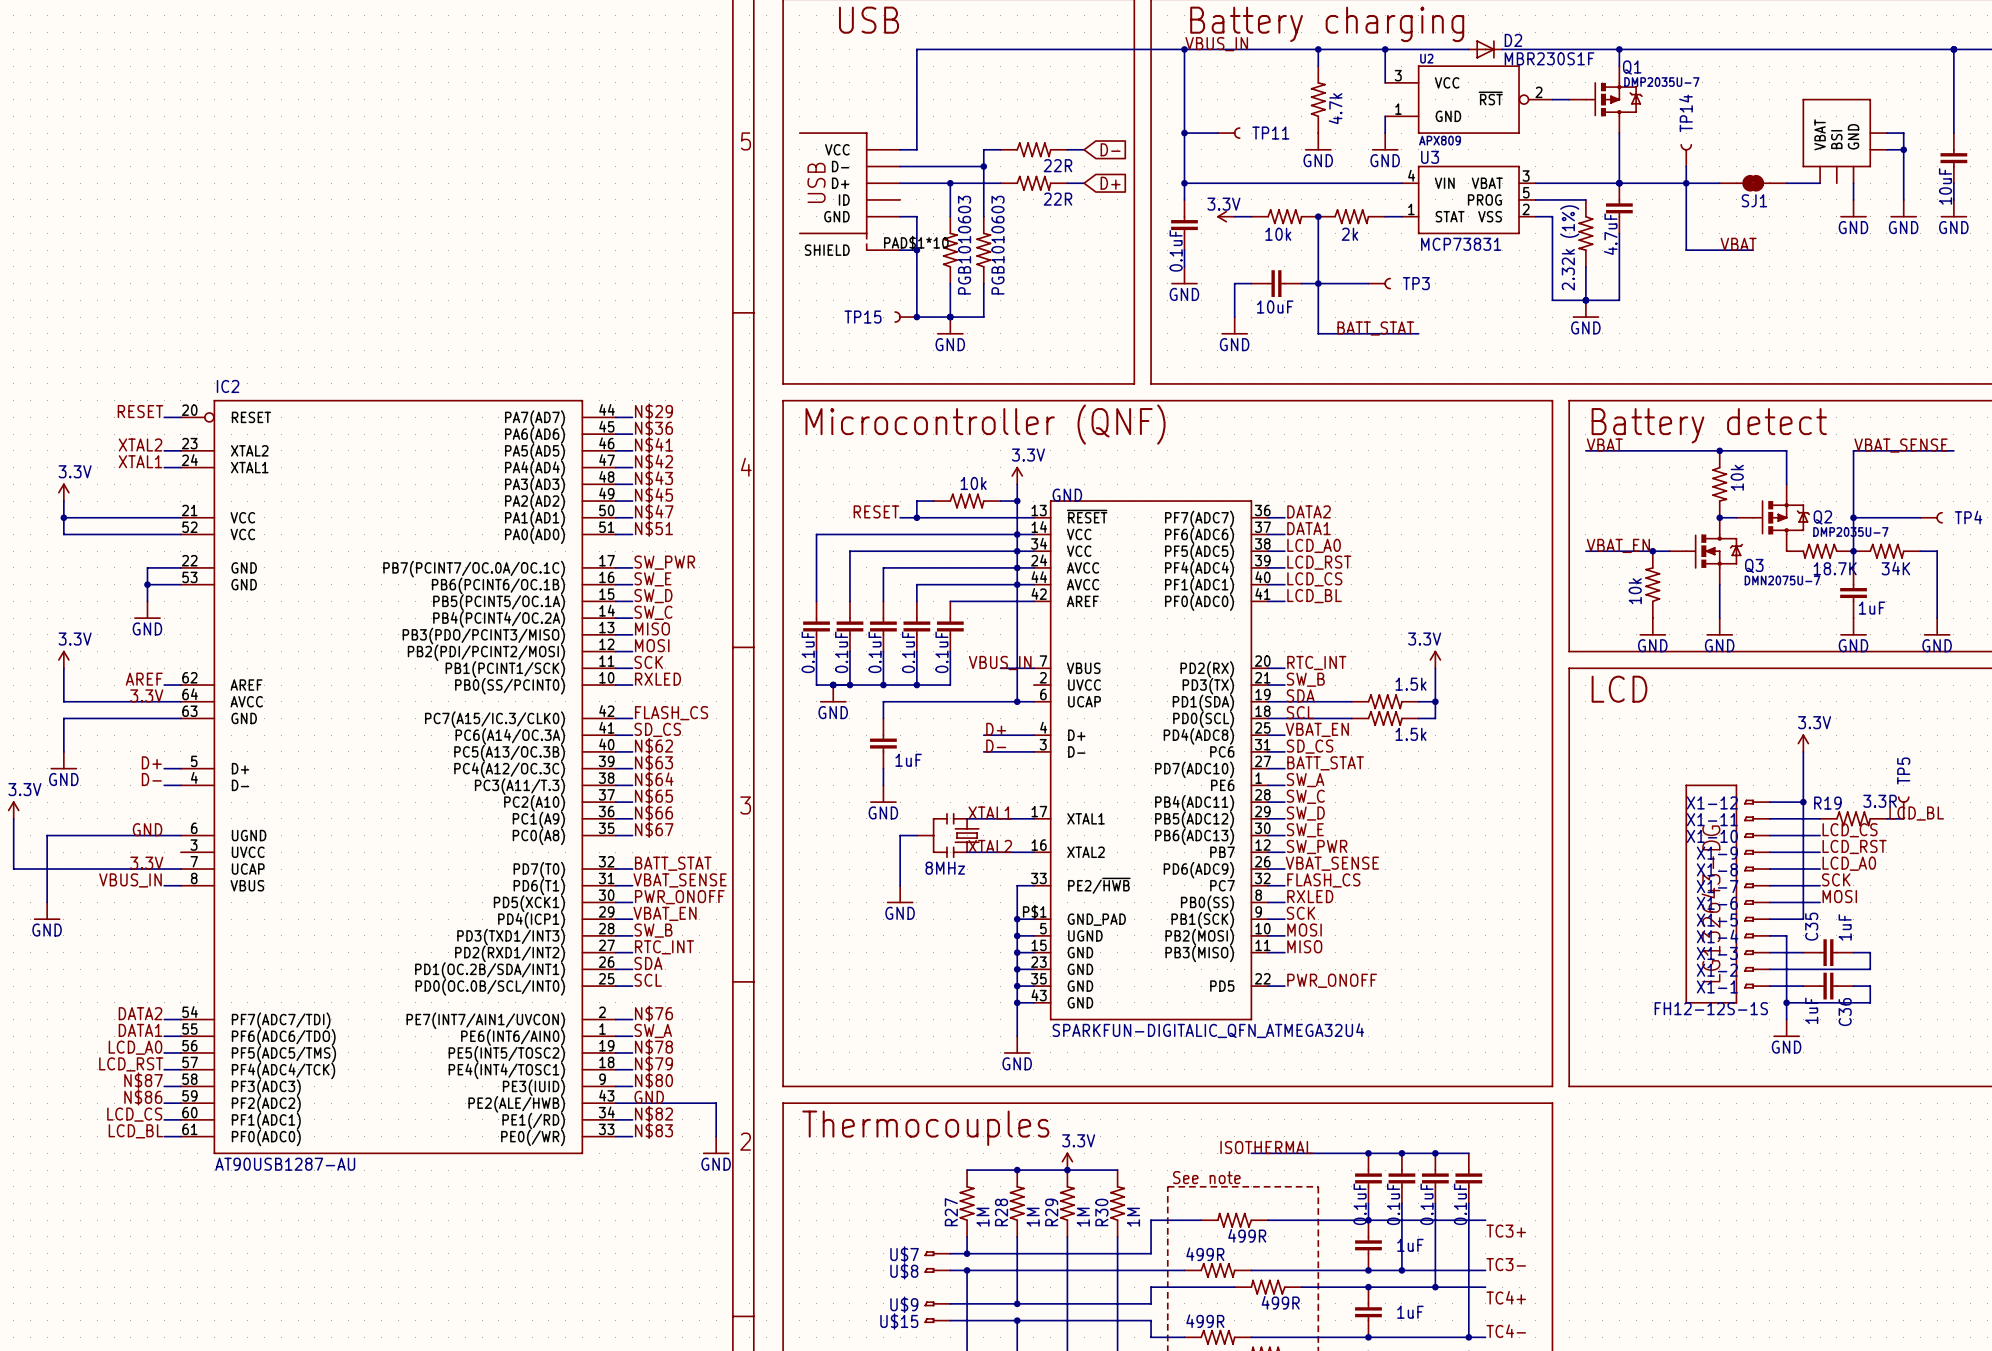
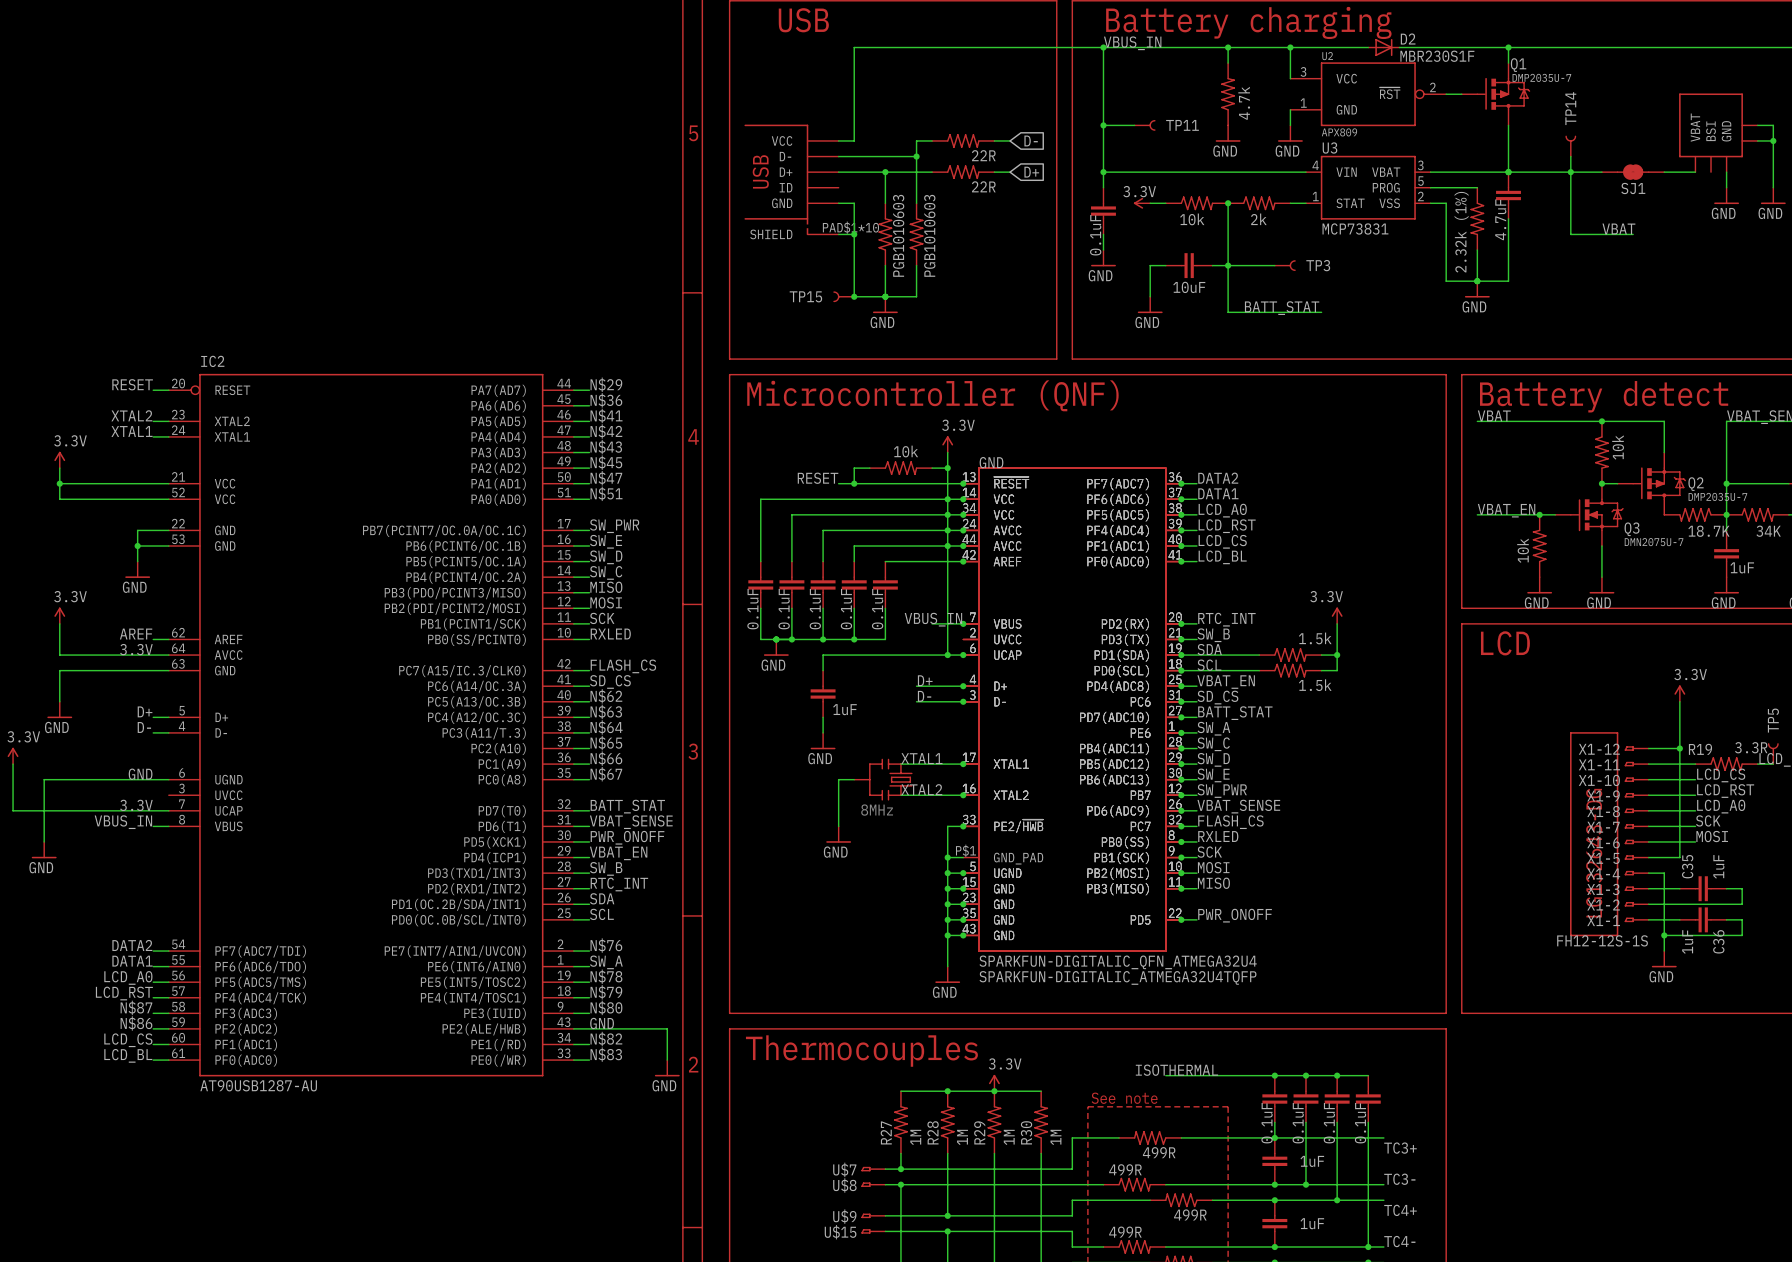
junction: none -> (963, 483)
junction: none -> (1181, 483)
junction: none -> (963, 499)
junction: none -> (1181, 499)
junction: none -> (963, 514)
junction: none -> (1181, 514)
junction: none -> (963, 530)
junction: none -> (1181, 530)
junction: none -> (963, 546)
junction: none -> (1181, 546)
junction: none -> (963, 561)
junction: none -> (1181, 561)
junction: none -> (963, 623)
junction: none -> (1181, 623)
junction: none -> (1181, 639)
junction: none -> (963, 655)
junction: none -> (1181, 655)
junction: none -> (1181, 670)
junction: none -> (963, 686)
junction: none -> (1181, 686)
junction: none -> (963, 701)
junction: none -> (1181, 701)
part: none -> SPARKFUN-DIGITALIC_ATMEGA32U4TQFP (1072, 709)
junction: none -> (1181, 717)
junction: none -> (1181, 732)
junction: none -> (1181, 748)
junction: none -> (963, 764)
junction: none -> (1181, 764)
junction: none -> (1181, 779)
junction: none -> (963, 795)
junction: none -> (1181, 795)
junction: none -> (1181, 810)
junction: none -> (963, 826)
junction: none -> (1181, 826)
junction: none -> (1181, 841)
junction: none -> (1181, 857)
junction: none -> (963, 873)
junction: none -> (1181, 873)
junction: none -> (963, 888)
junction: none -> (1181, 888)
junction: none -> (963, 904)
junction: none -> (963, 919)
junction: none -> (1181, 919)
junction: none -> (963, 935)

